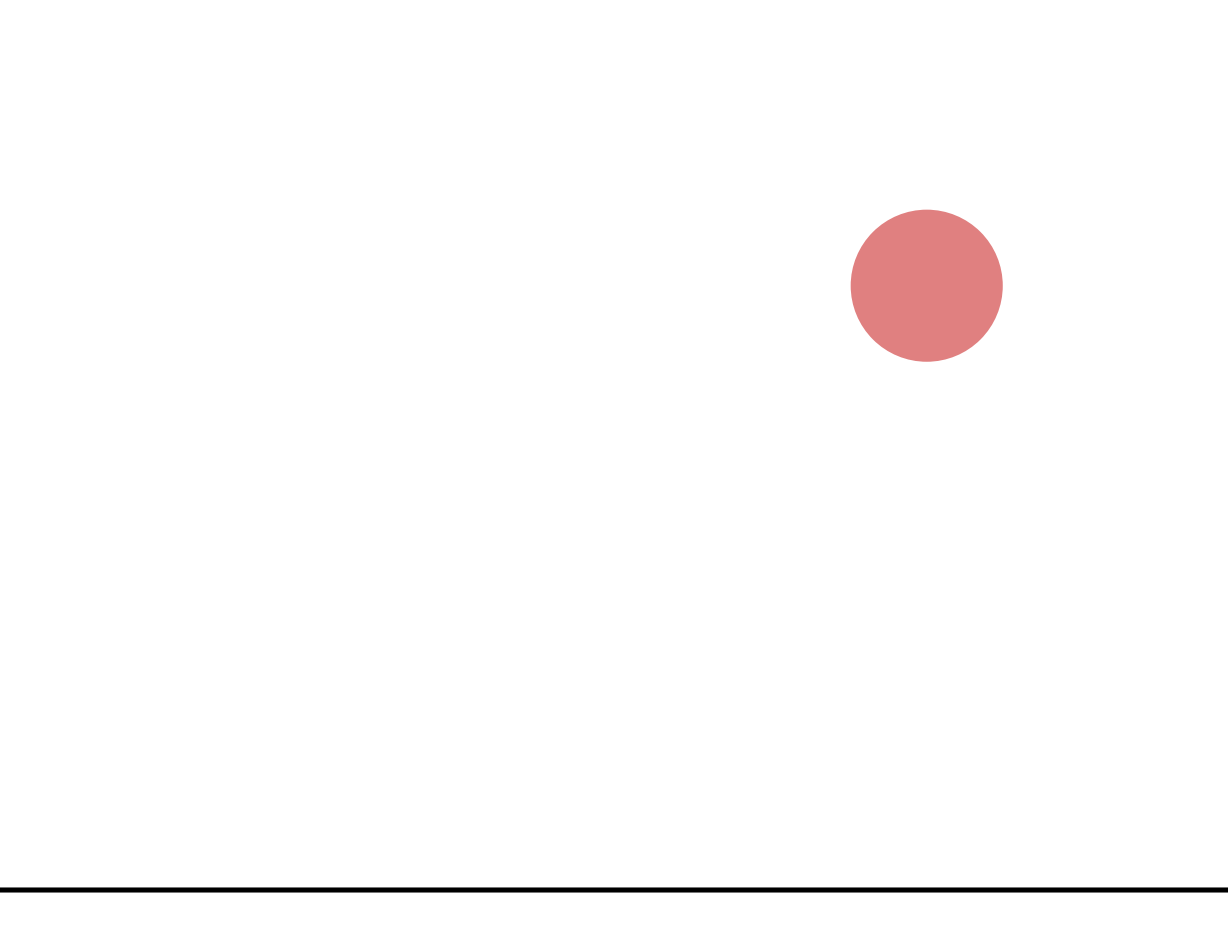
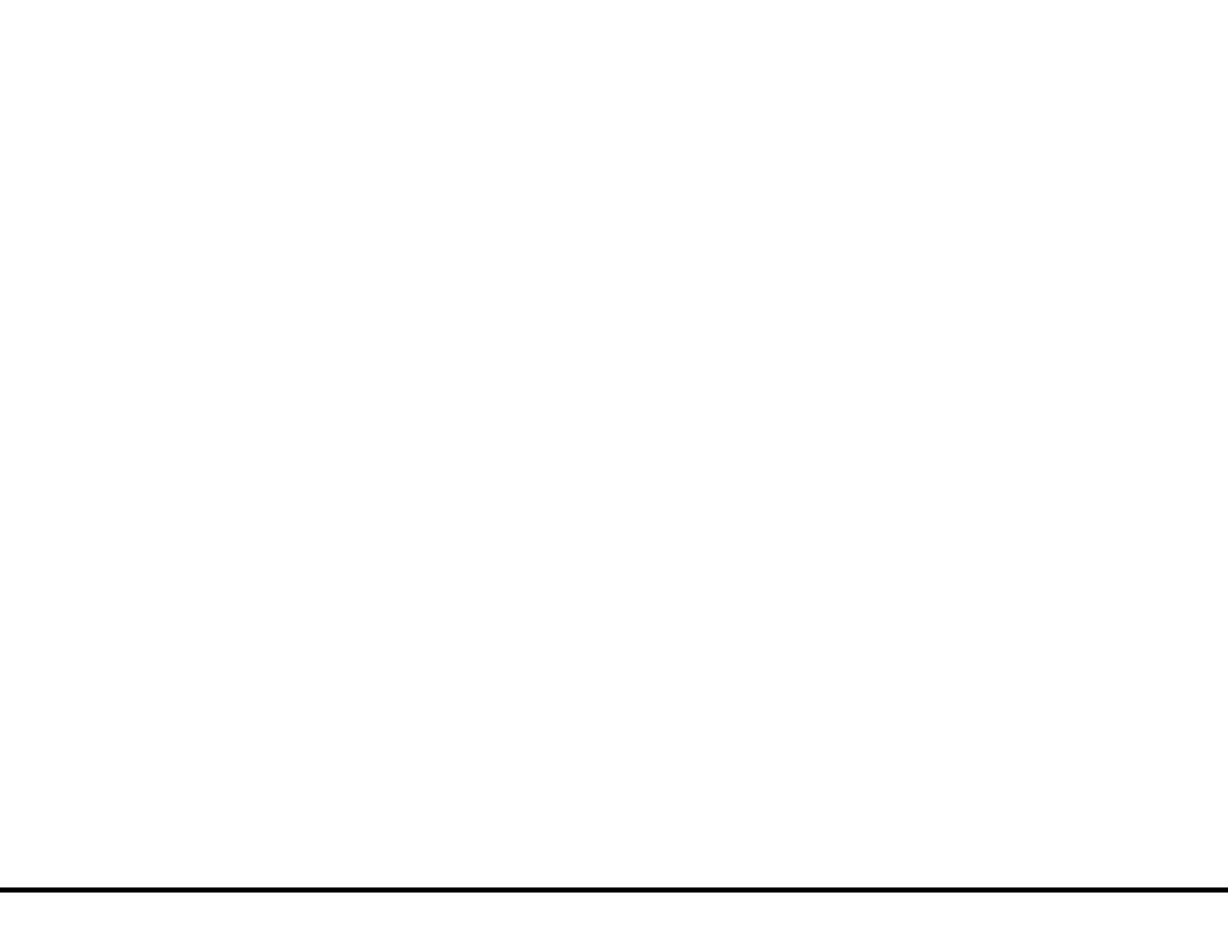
part: (926, 285) -> none

